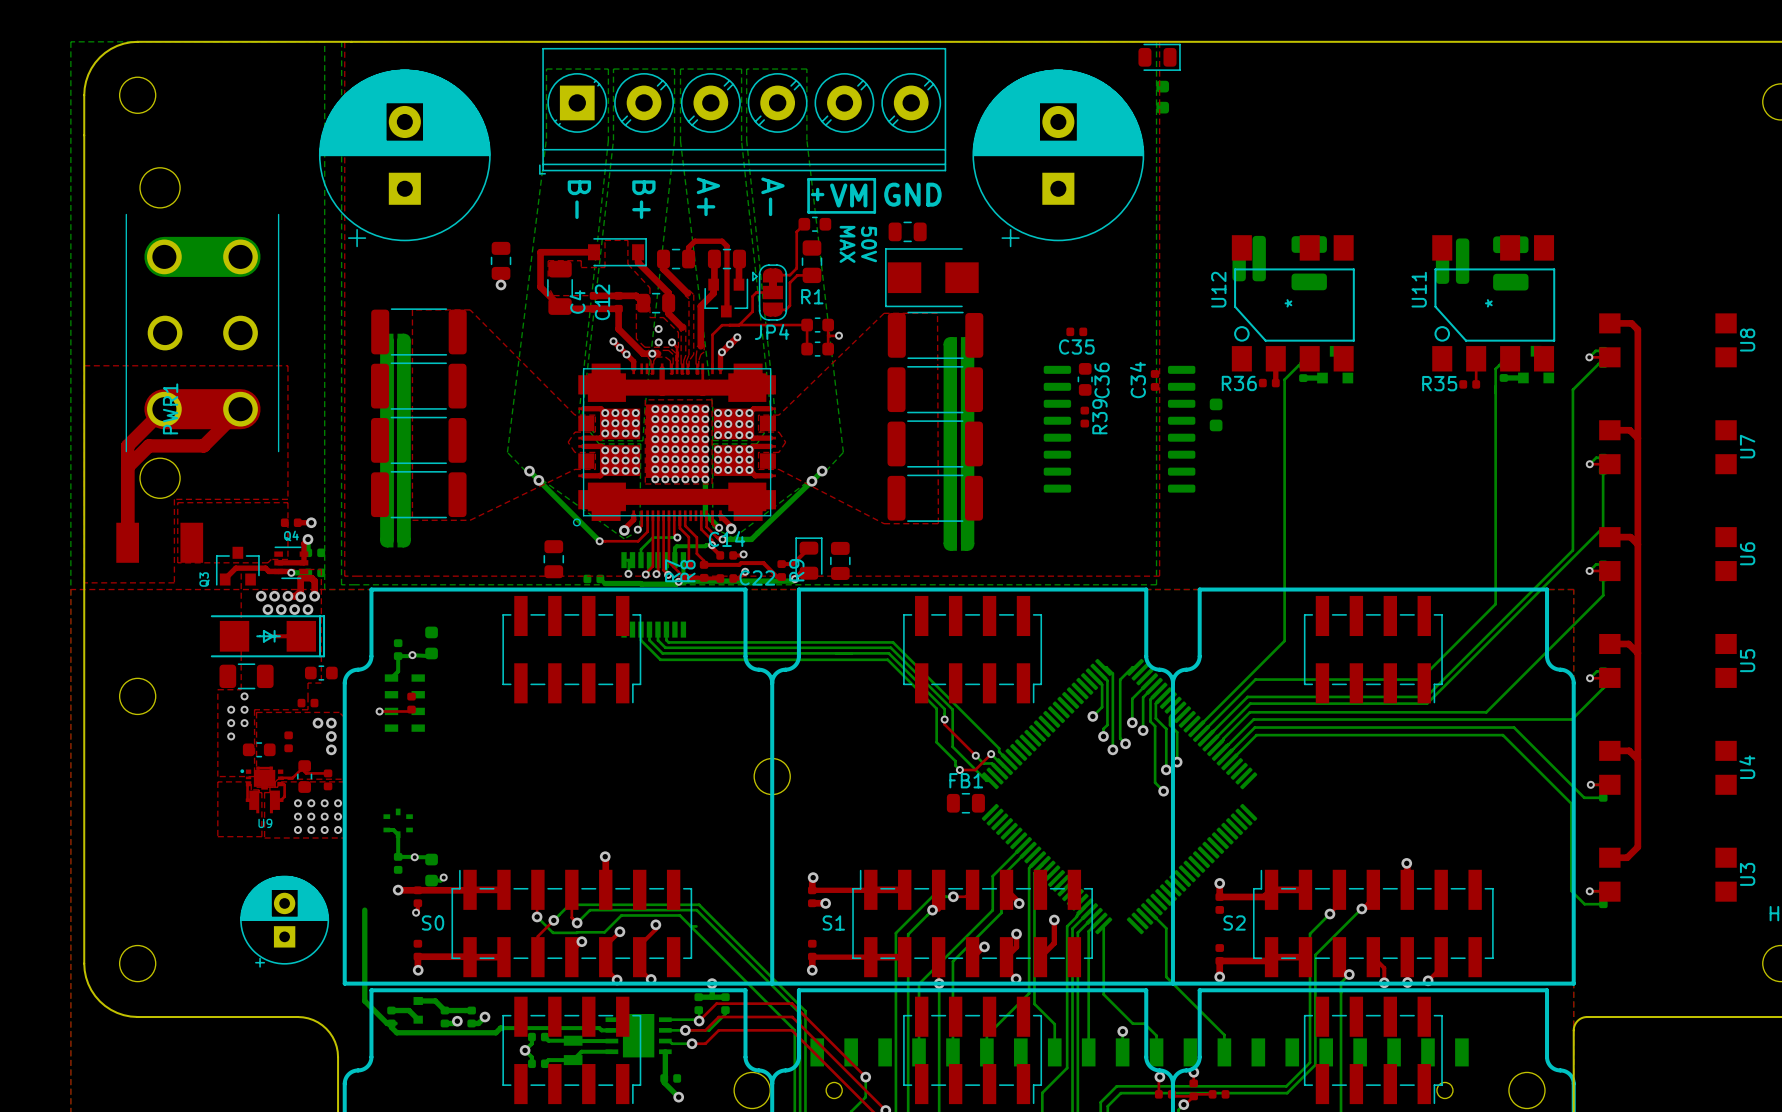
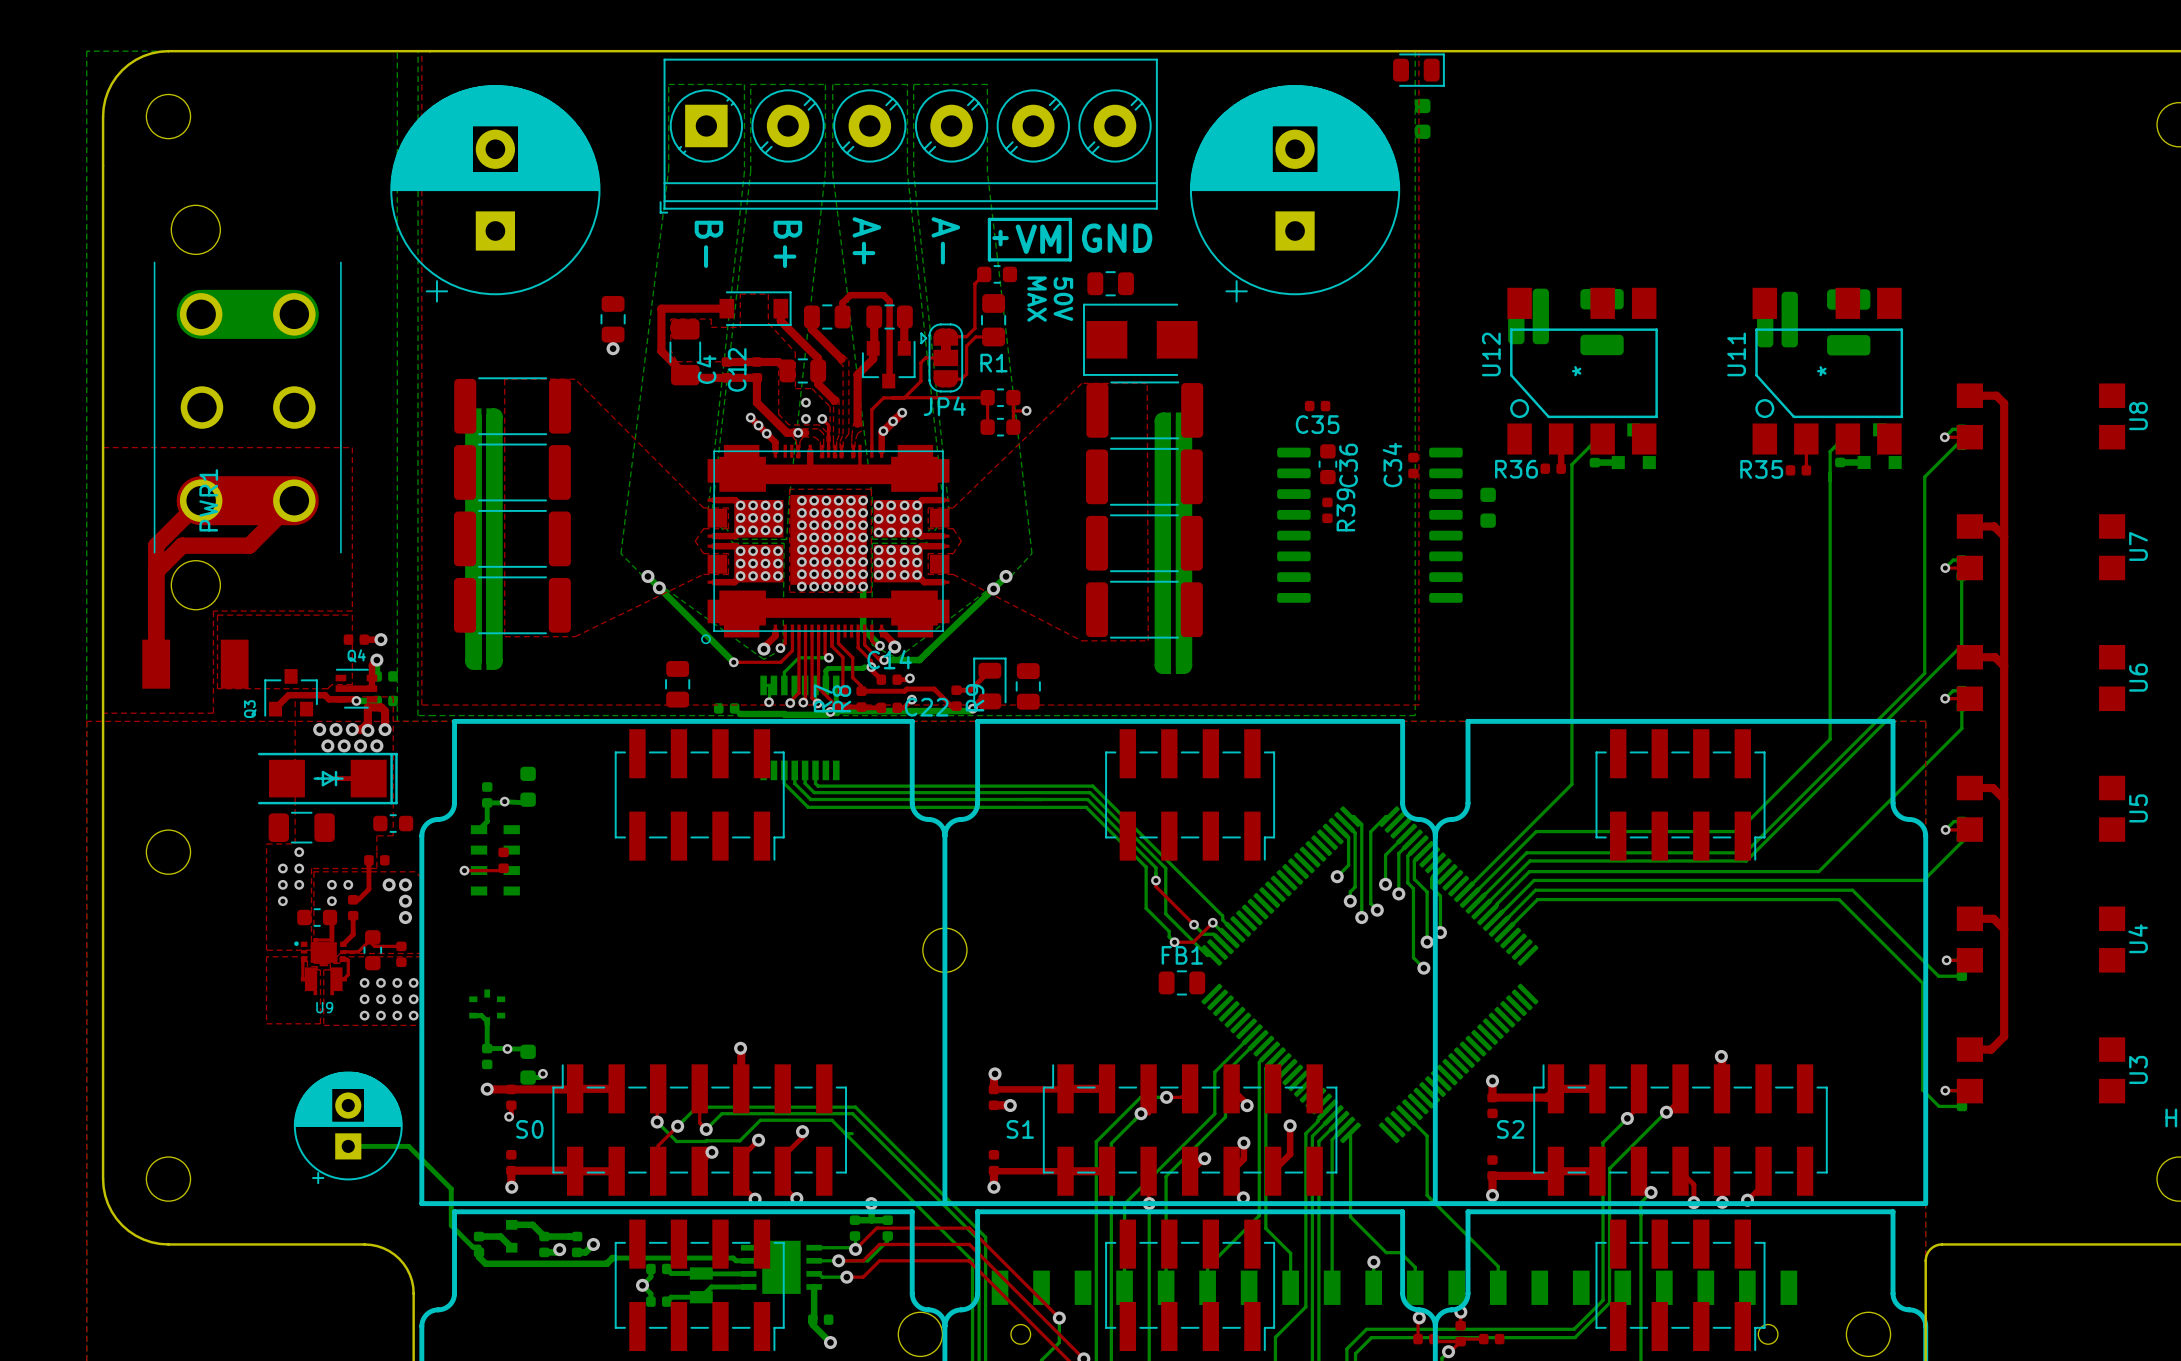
top track: none -> (368, 860) (368, 889) (358, 899) (353, 899)
via: none -> (331, 884)
via: none -> (348, 884)
via: none -> (331, 901)
top track: none -> (353, 915) (353, 934) (343, 944)
top track: none -> (330, 917) (331, 919) (331, 940)
bottom track: (364, 910) (364, 1001) (387, 1023) (395, 1023) -> none
bottom track: none -> (348, 1146) (408, 1146) (451, 1188) (451, 1225) (472, 1247) (478, 1247) (479, 1252)

